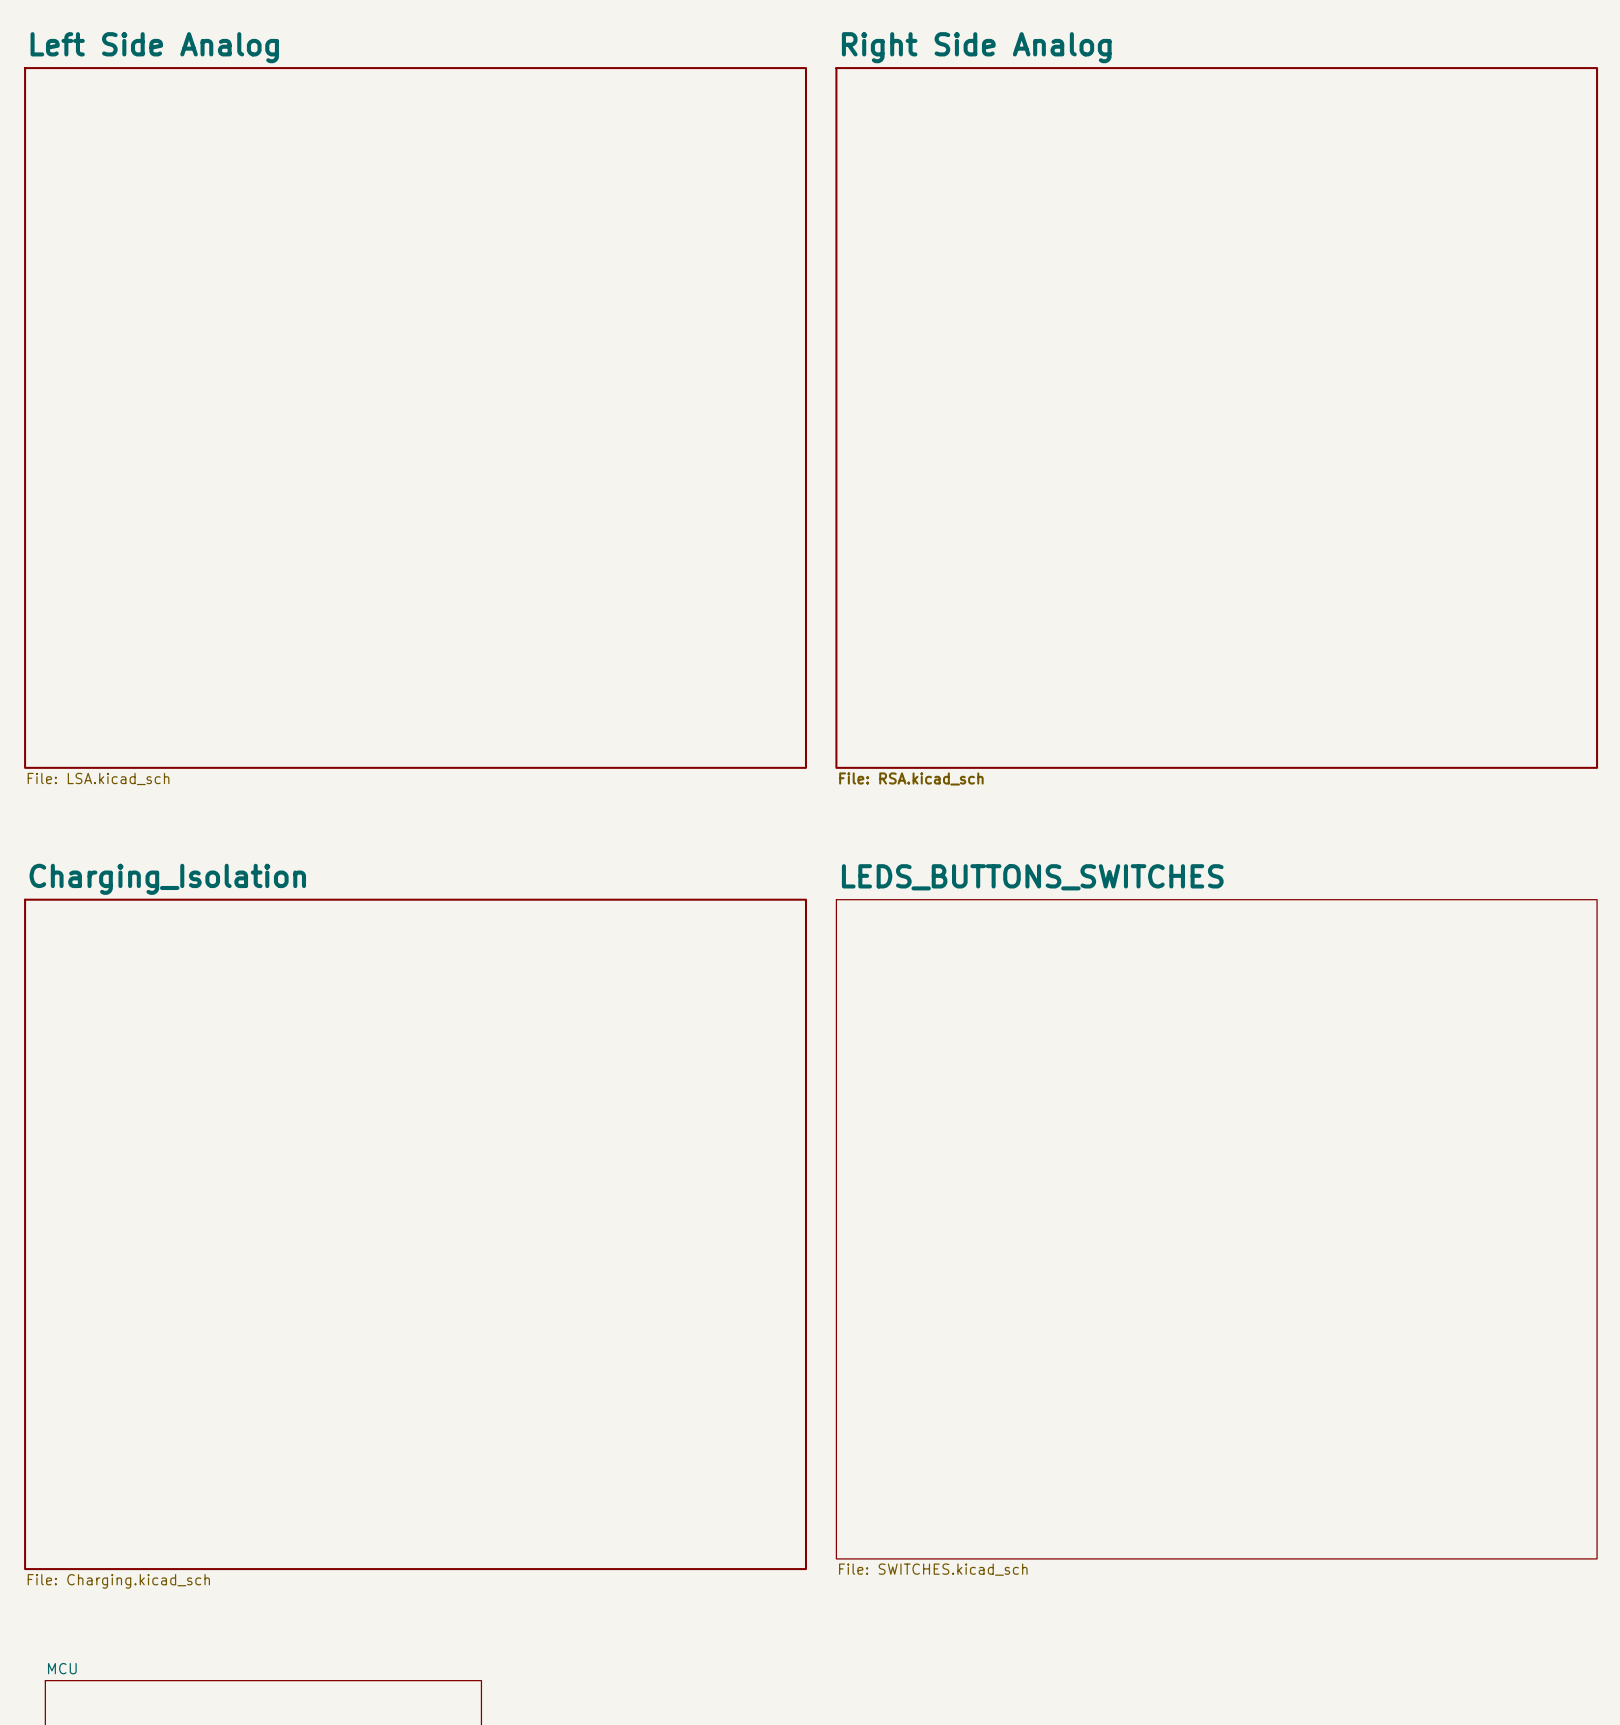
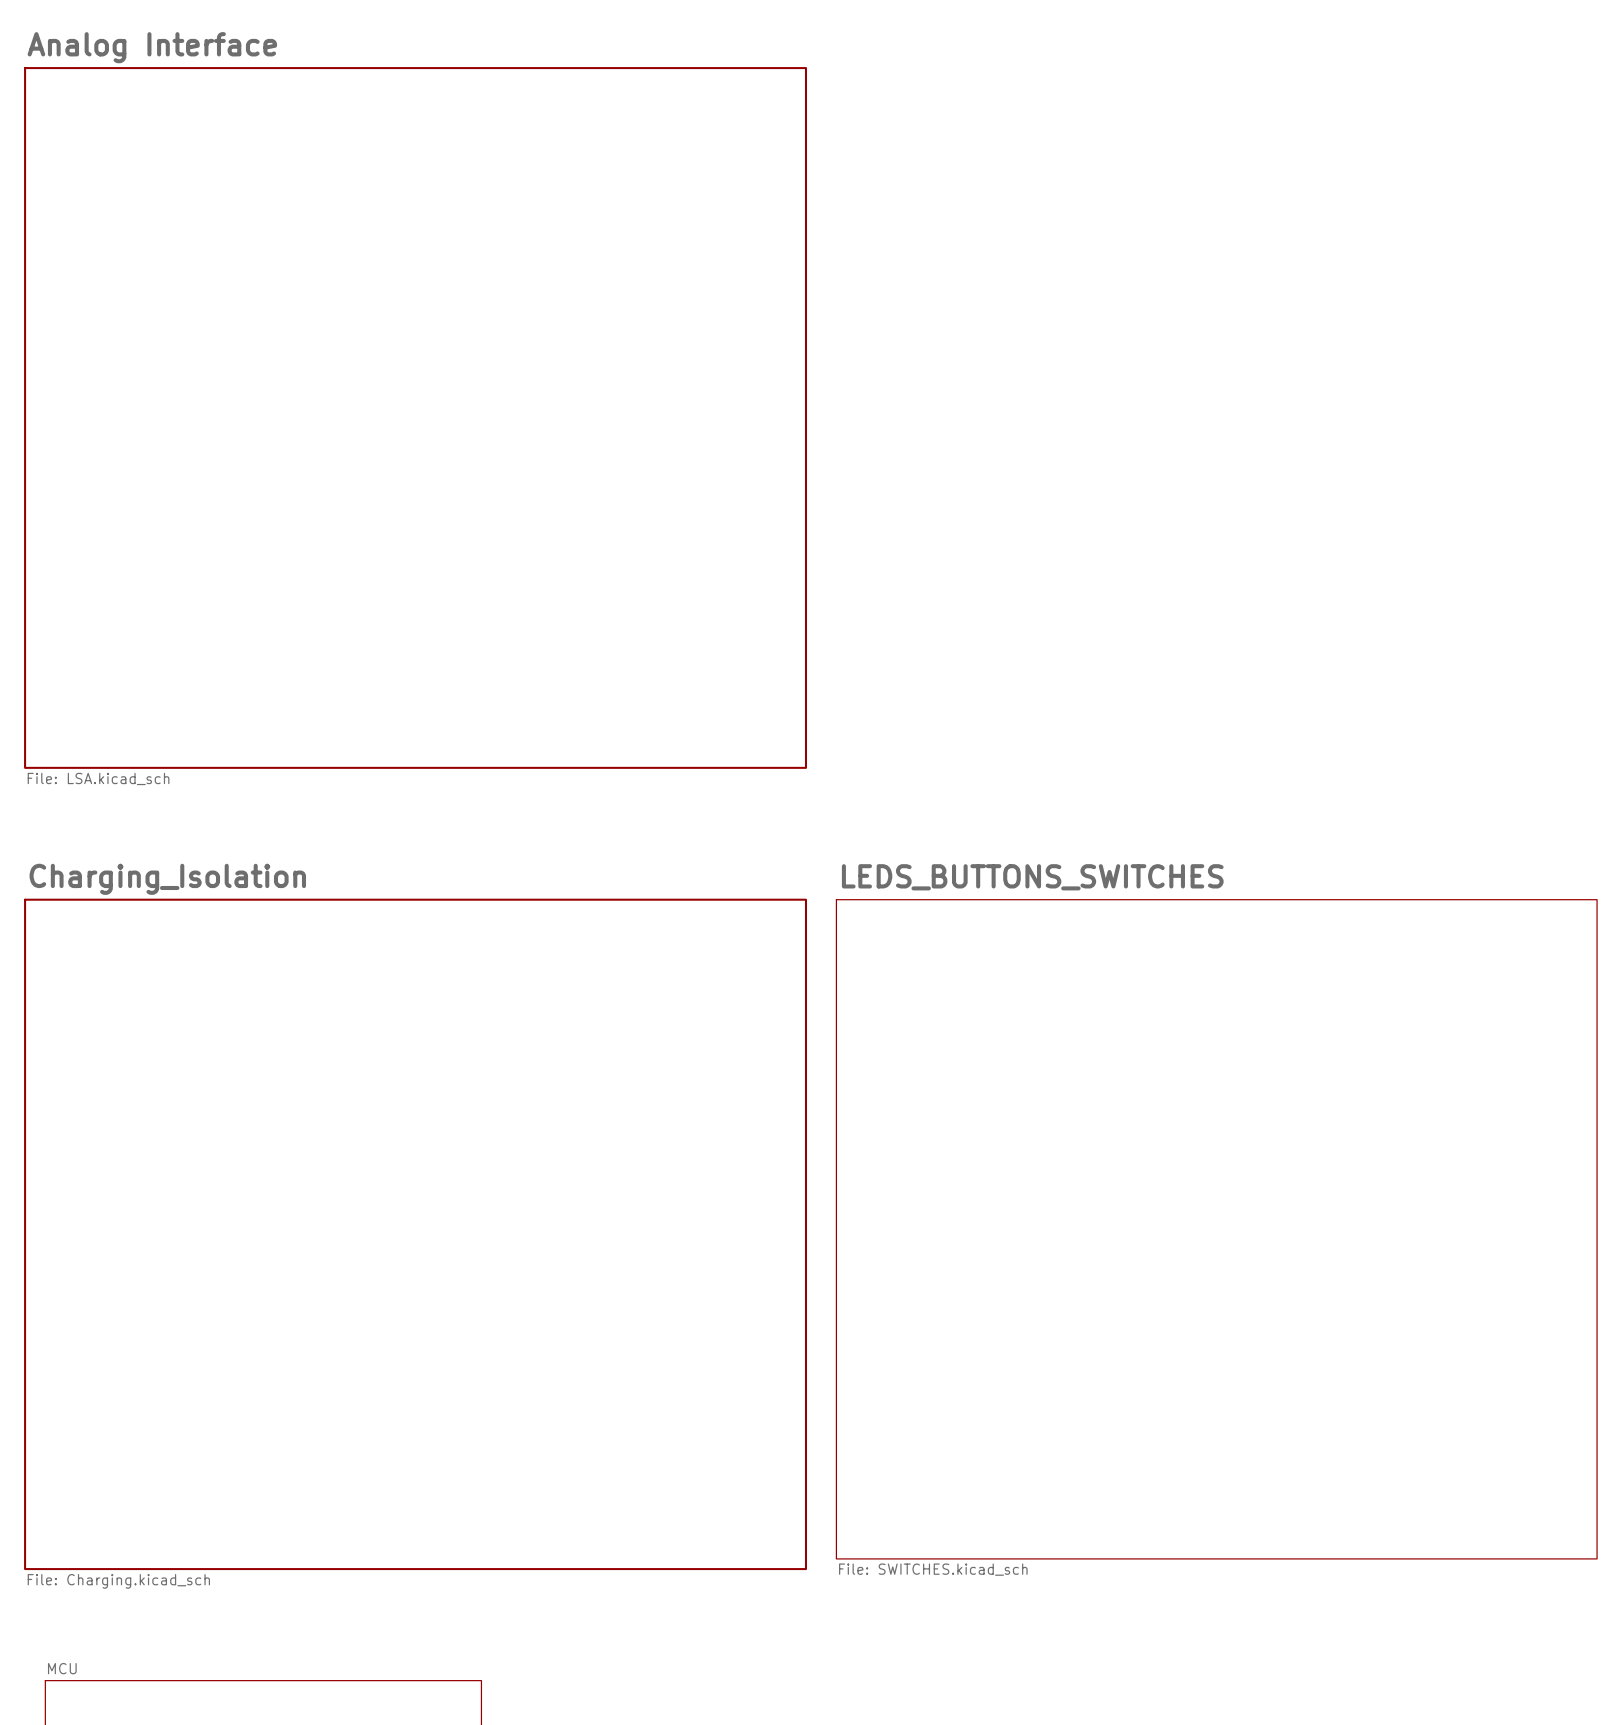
sheet Left Side Analog name: Left Side Analog (154, 47) -> Analog Interface (152, 47)
sheet Right Side Analog: File: RSA.kicad_sch (1216, 417) -> none

